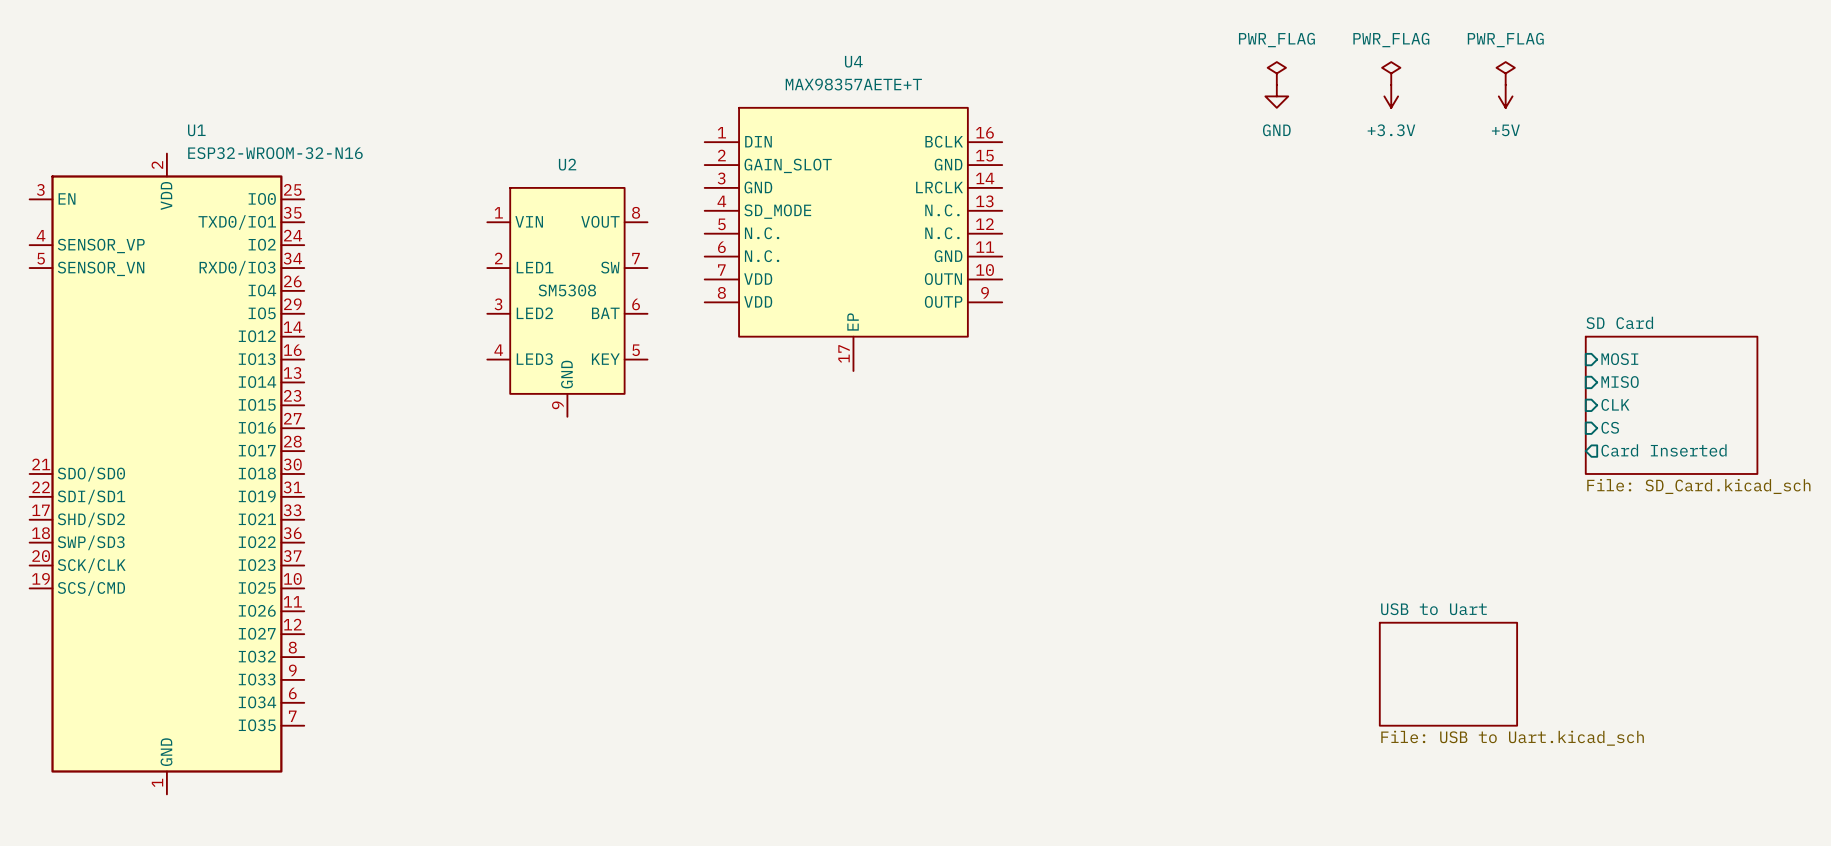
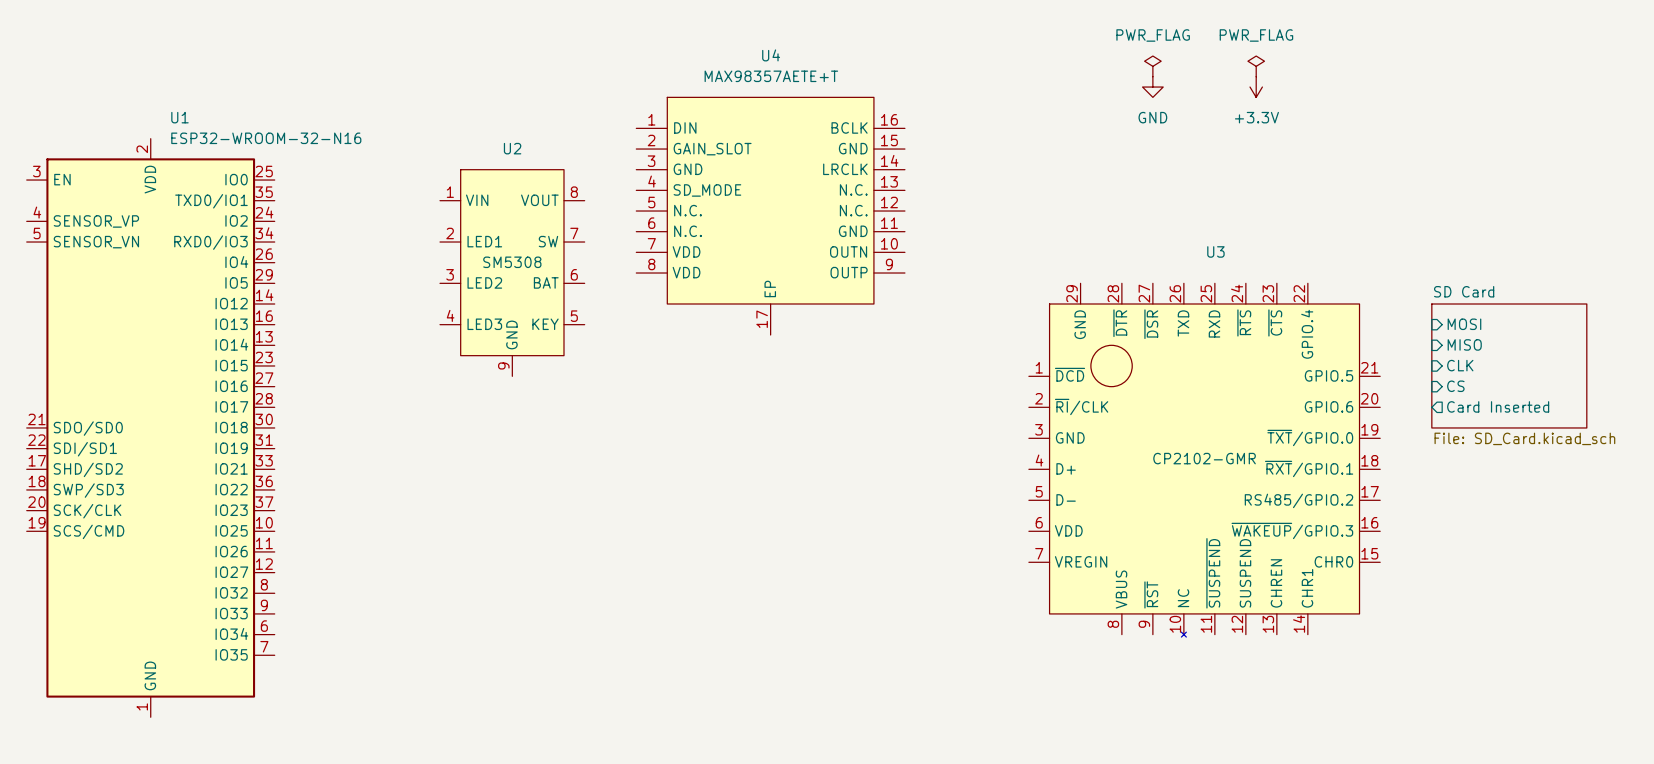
power symbol: PWR_FLAG (1505, 73) -> none
power symbol: +5V (1505, 96) -> none
U3: none -> CP2102-GMR (1204, 460)
sheet USB to Uart: File: USB to Uart.kicad_sch (1448, 674) -> none

